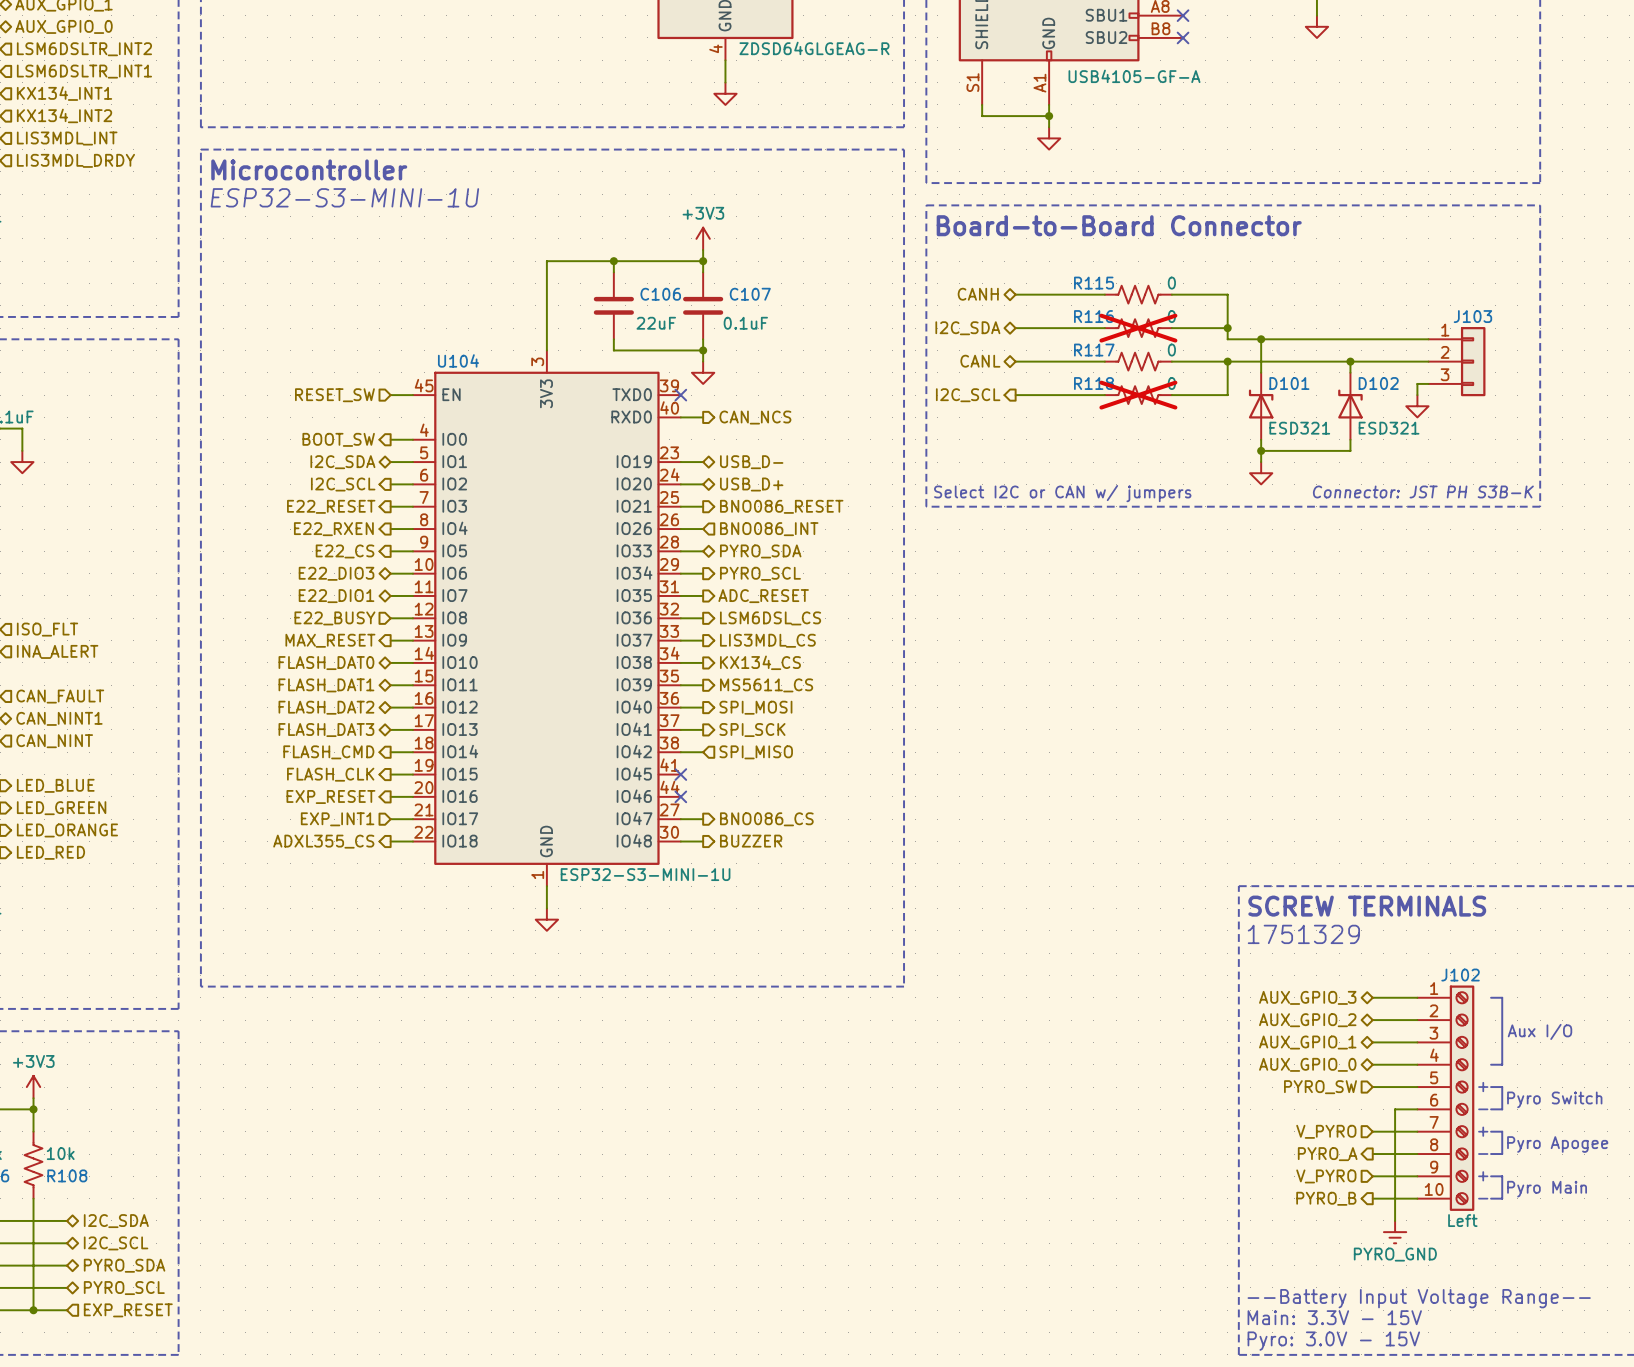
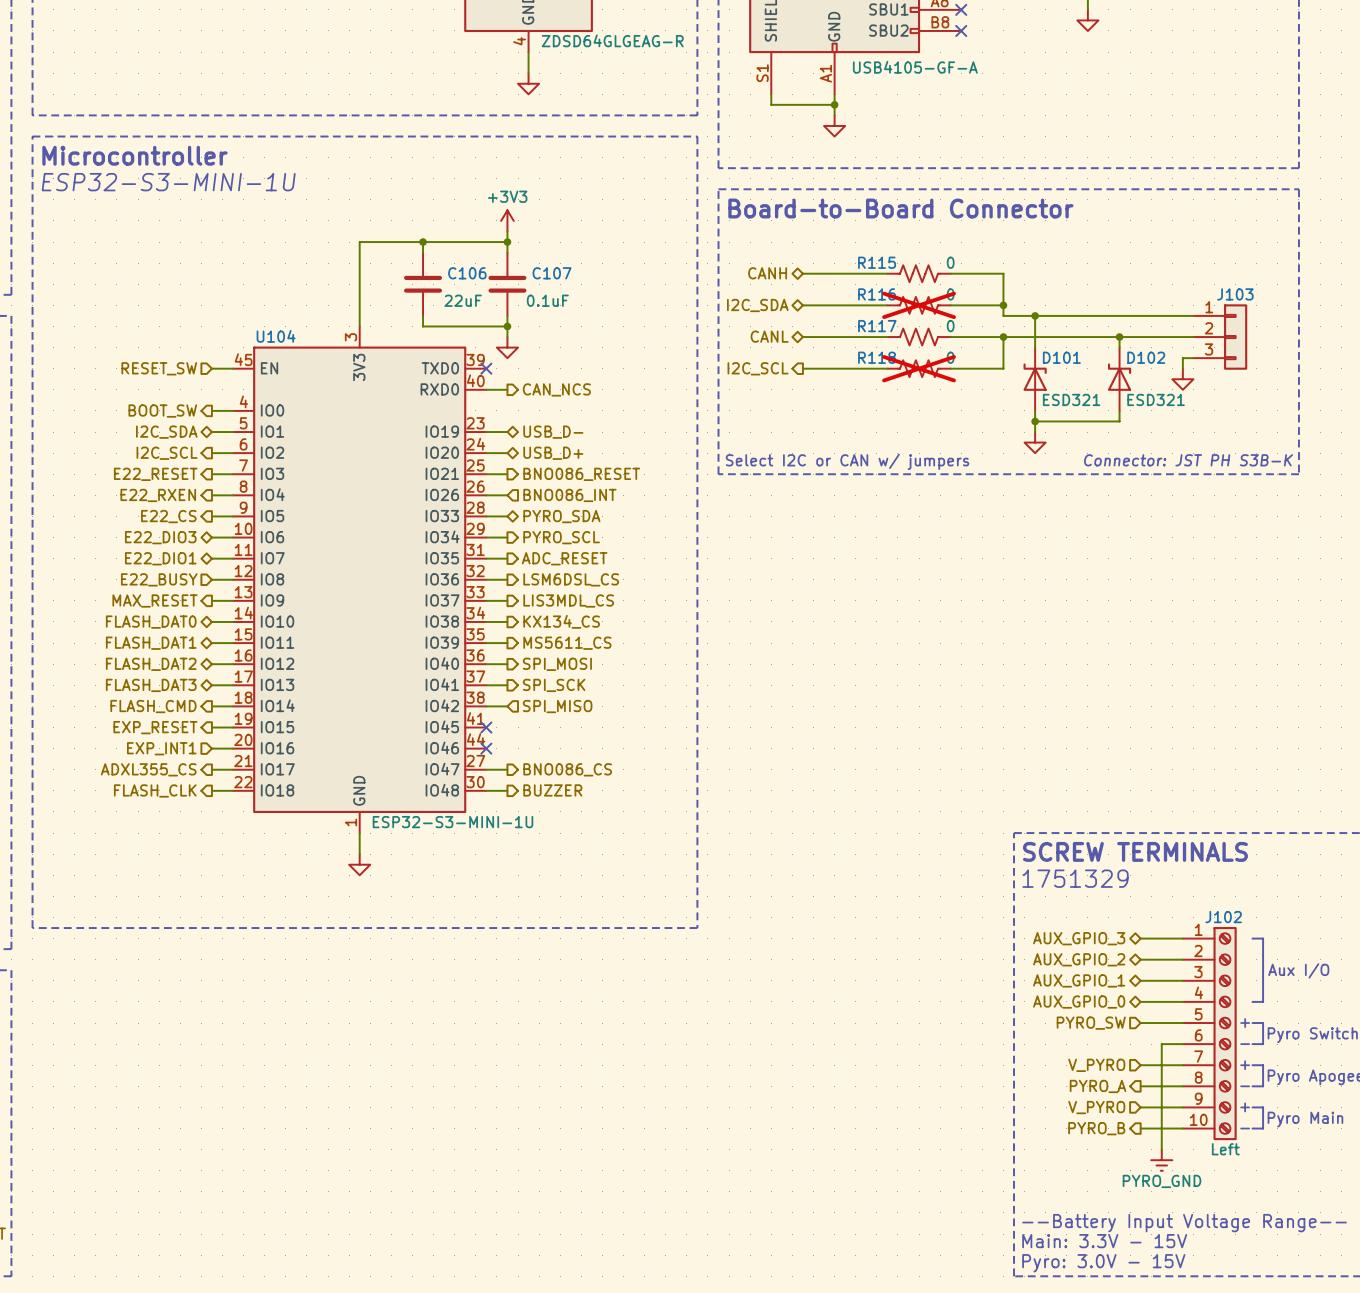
hierarchical label: FLASH_CLK (330, 774) -> EXP_RESET (155, 727)
hierarchical label shape: output (330, 796) -> input (161, 748)
hierarchical label: EXP_RESET (330, 796) -> EXP_INT1 (161, 748)
hierarchical label shape: input (337, 819) -> output (148, 769)
hierarchical label: EXP_INT1 (337, 819) -> ADXL355_CS (148, 769)
hierarchical label: ADXL355_CS (323, 841) -> FLASH_CLK (155, 790)

